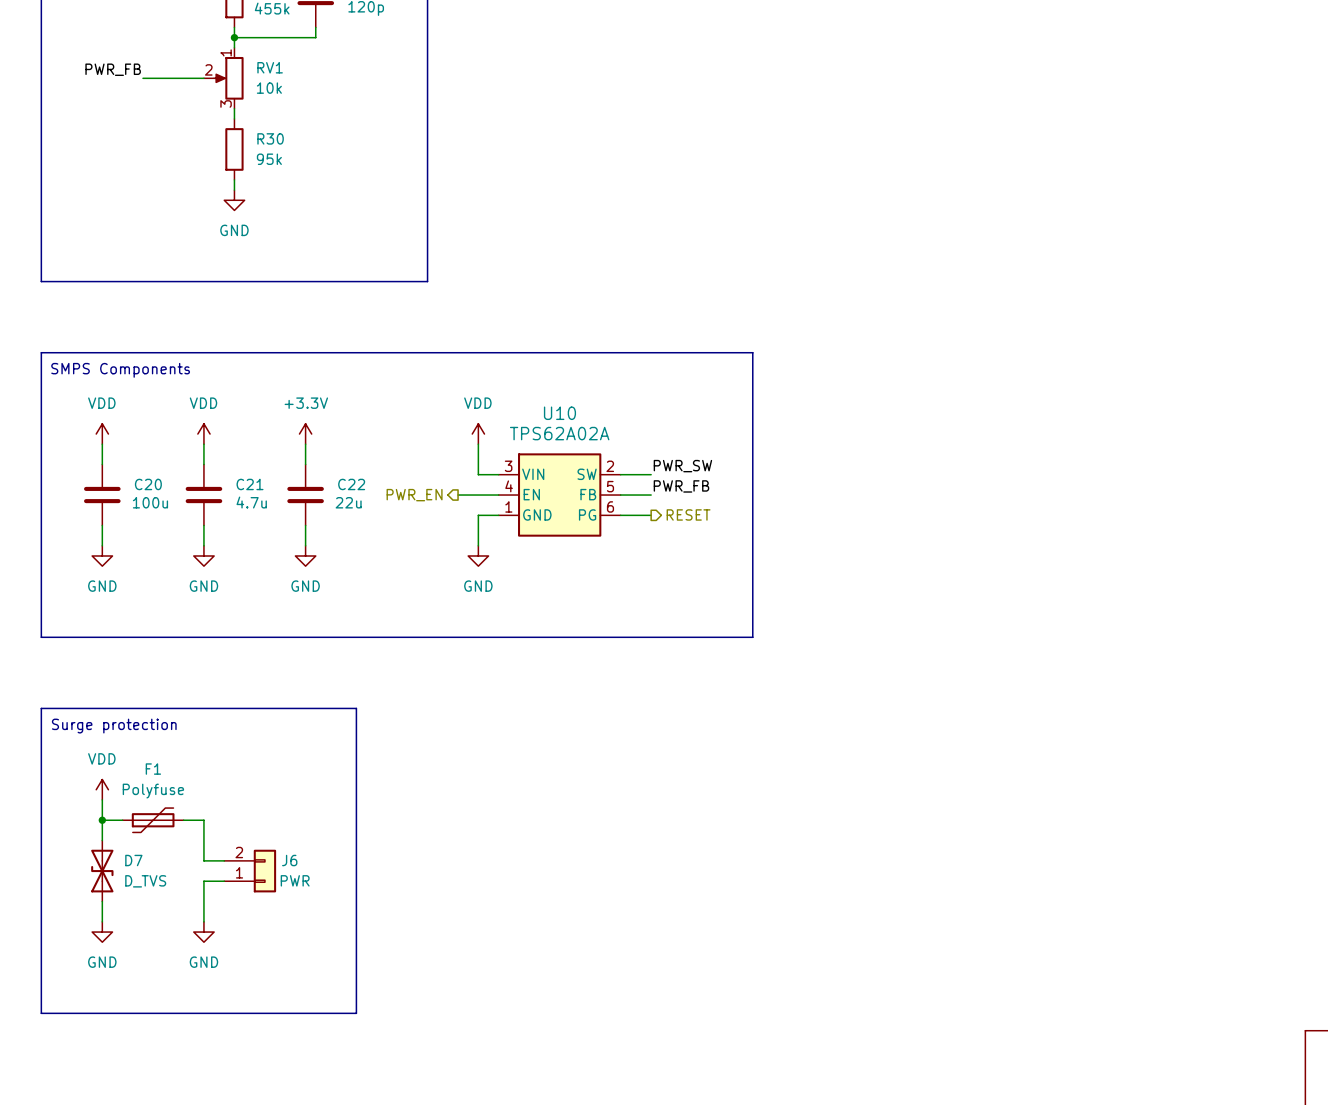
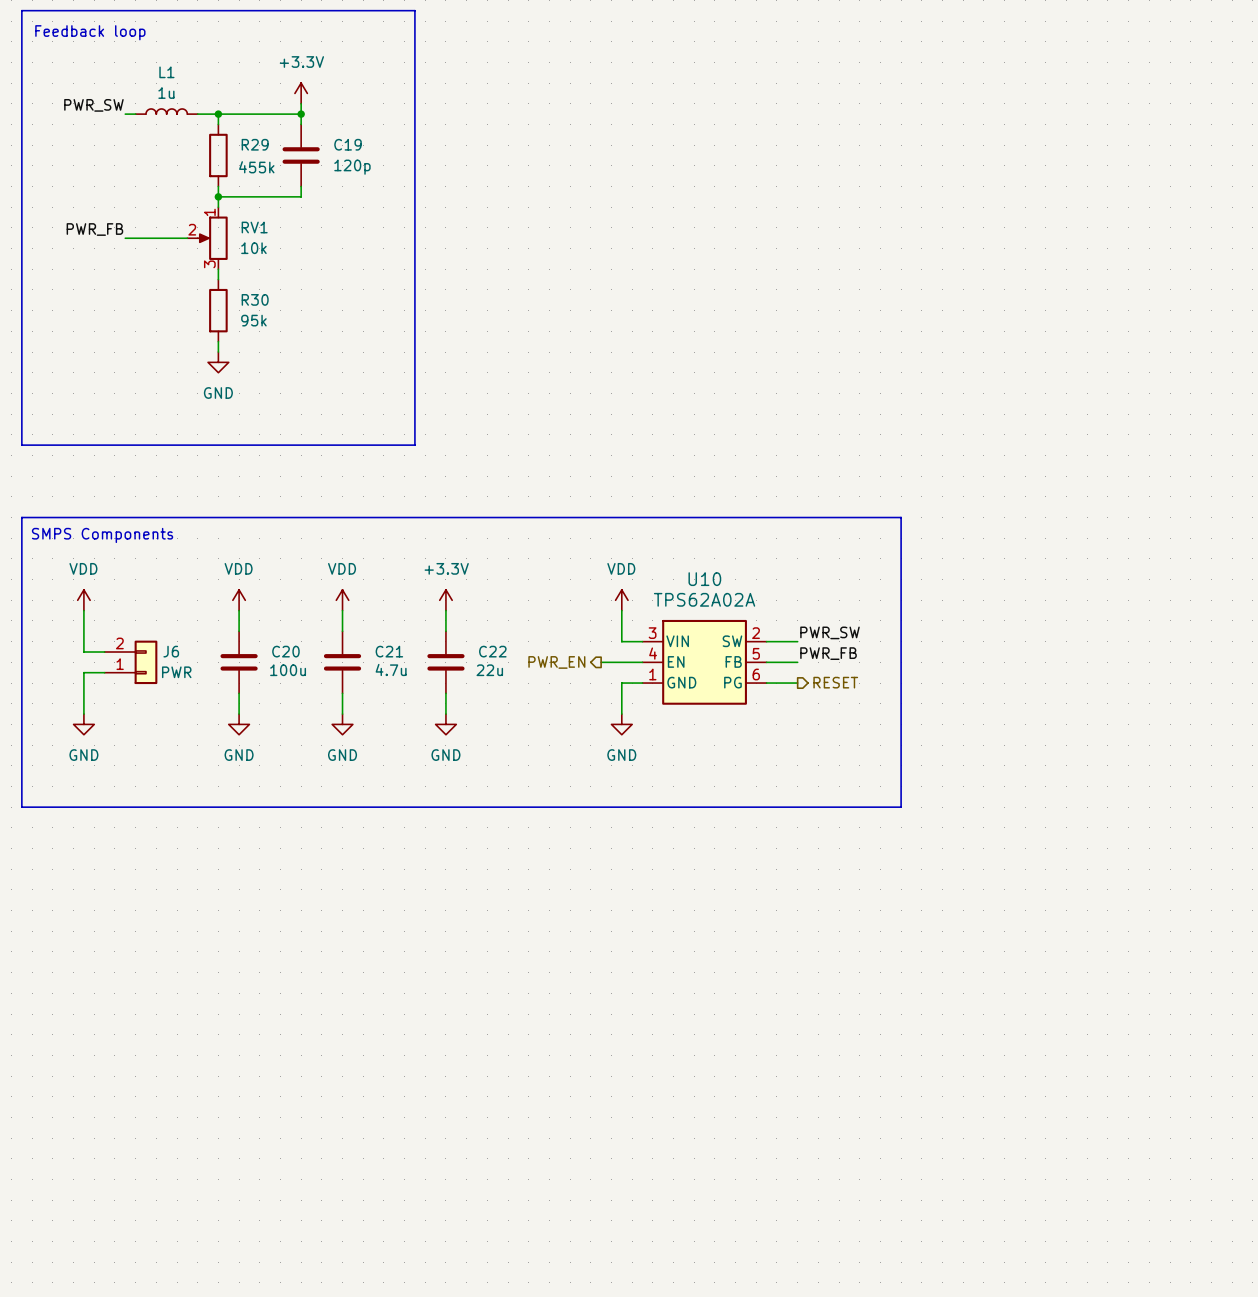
line: (752, 352) (752, 637) -> (745, 517) (901, 517) (901, 807) (745, 807)
power symbol position: VDD (203, 434) -> VDD (239, 600)
power symbol position: +3.3V (305, 434) -> +3.3V (445, 600)
power symbol: none -> VDD (342, 600)
power symbol: VDD (478, 434) -> none
power symbol: none -> VDD (621, 600)
wire: (203, 444) (203, 464) -> (239, 610) (239, 631)
wire: (305, 444) (305, 464) -> (342, 610) (342, 631)
wire: none -> (445, 610) (445, 631)
wire: (478, 444) (478, 474) (498, 474) -> none
label position: PWR_SW (682, 466) -> PWR_SW (829, 632)
wire: (620, 474) (630, 474) -> (621, 610) (621, 641)
wire: none -> (766, 641) (797, 641)
label position: PWR_FB (681, 486) -> PWR_FB (828, 653)
C20 position: (102, 495) -> (239, 662)
C21 position: (203, 495) -> (342, 662)
C22 position: (305, 495) -> (445, 662)
hierarchical label position: PWR_EN (414, 495) -> PWR_EN (556, 662)
wire: (458, 495) (498, 495) -> none
U10 position: (559, 495) -> (704, 662)
wire: none -> (766, 662) (797, 662)
hierarchical label position: RESET (688, 514) -> RESET (835, 682)
wire: (498, 515) (478, 515) (478, 545) -> none
wire: (620, 515) (630, 515) -> (621, 714) (621, 683)
wire: none -> (766, 683) (797, 683)
wire: (203, 525) (203, 545) -> (239, 693) (239, 714)
wire: (305, 525) (305, 545) -> (342, 693) (342, 714)
wire: none -> (445, 693) (445, 714)
power symbol: GND (203, 555) -> none
power symbol: none -> GND (239, 724)
power symbol: GND (305, 555) -> none
power symbol: none -> GND (342, 724)
power symbol position: GND (478, 555) -> GND (445, 724)
power symbol: none -> GND (621, 724)
line: (41, 708) (41, 1013) (356, 1013) (356, 708) (41, 708) -> none
text: Surge protection (114, 726) -> none
power symbol: VDD (102, 789) -> none
wire: (102, 799) (102, 840) -> none
wire: (102, 820) (122, 820) -> none
junction: (102, 820) -> none
F1: Polyfuse (153, 820) -> none
wire: (183, 820) (203, 820) (203, 860) (224, 860) -> none
D7: D_TVS (102, 871) -> none
J6 position: (250, 871) -> (130, 662)
wire: (224, 881) (203, 881) (203, 921) -> none
wire: (102, 901) (102, 921) -> none
power symbol: GND (102, 932) -> none
power symbol: GND (203, 932) -> none

